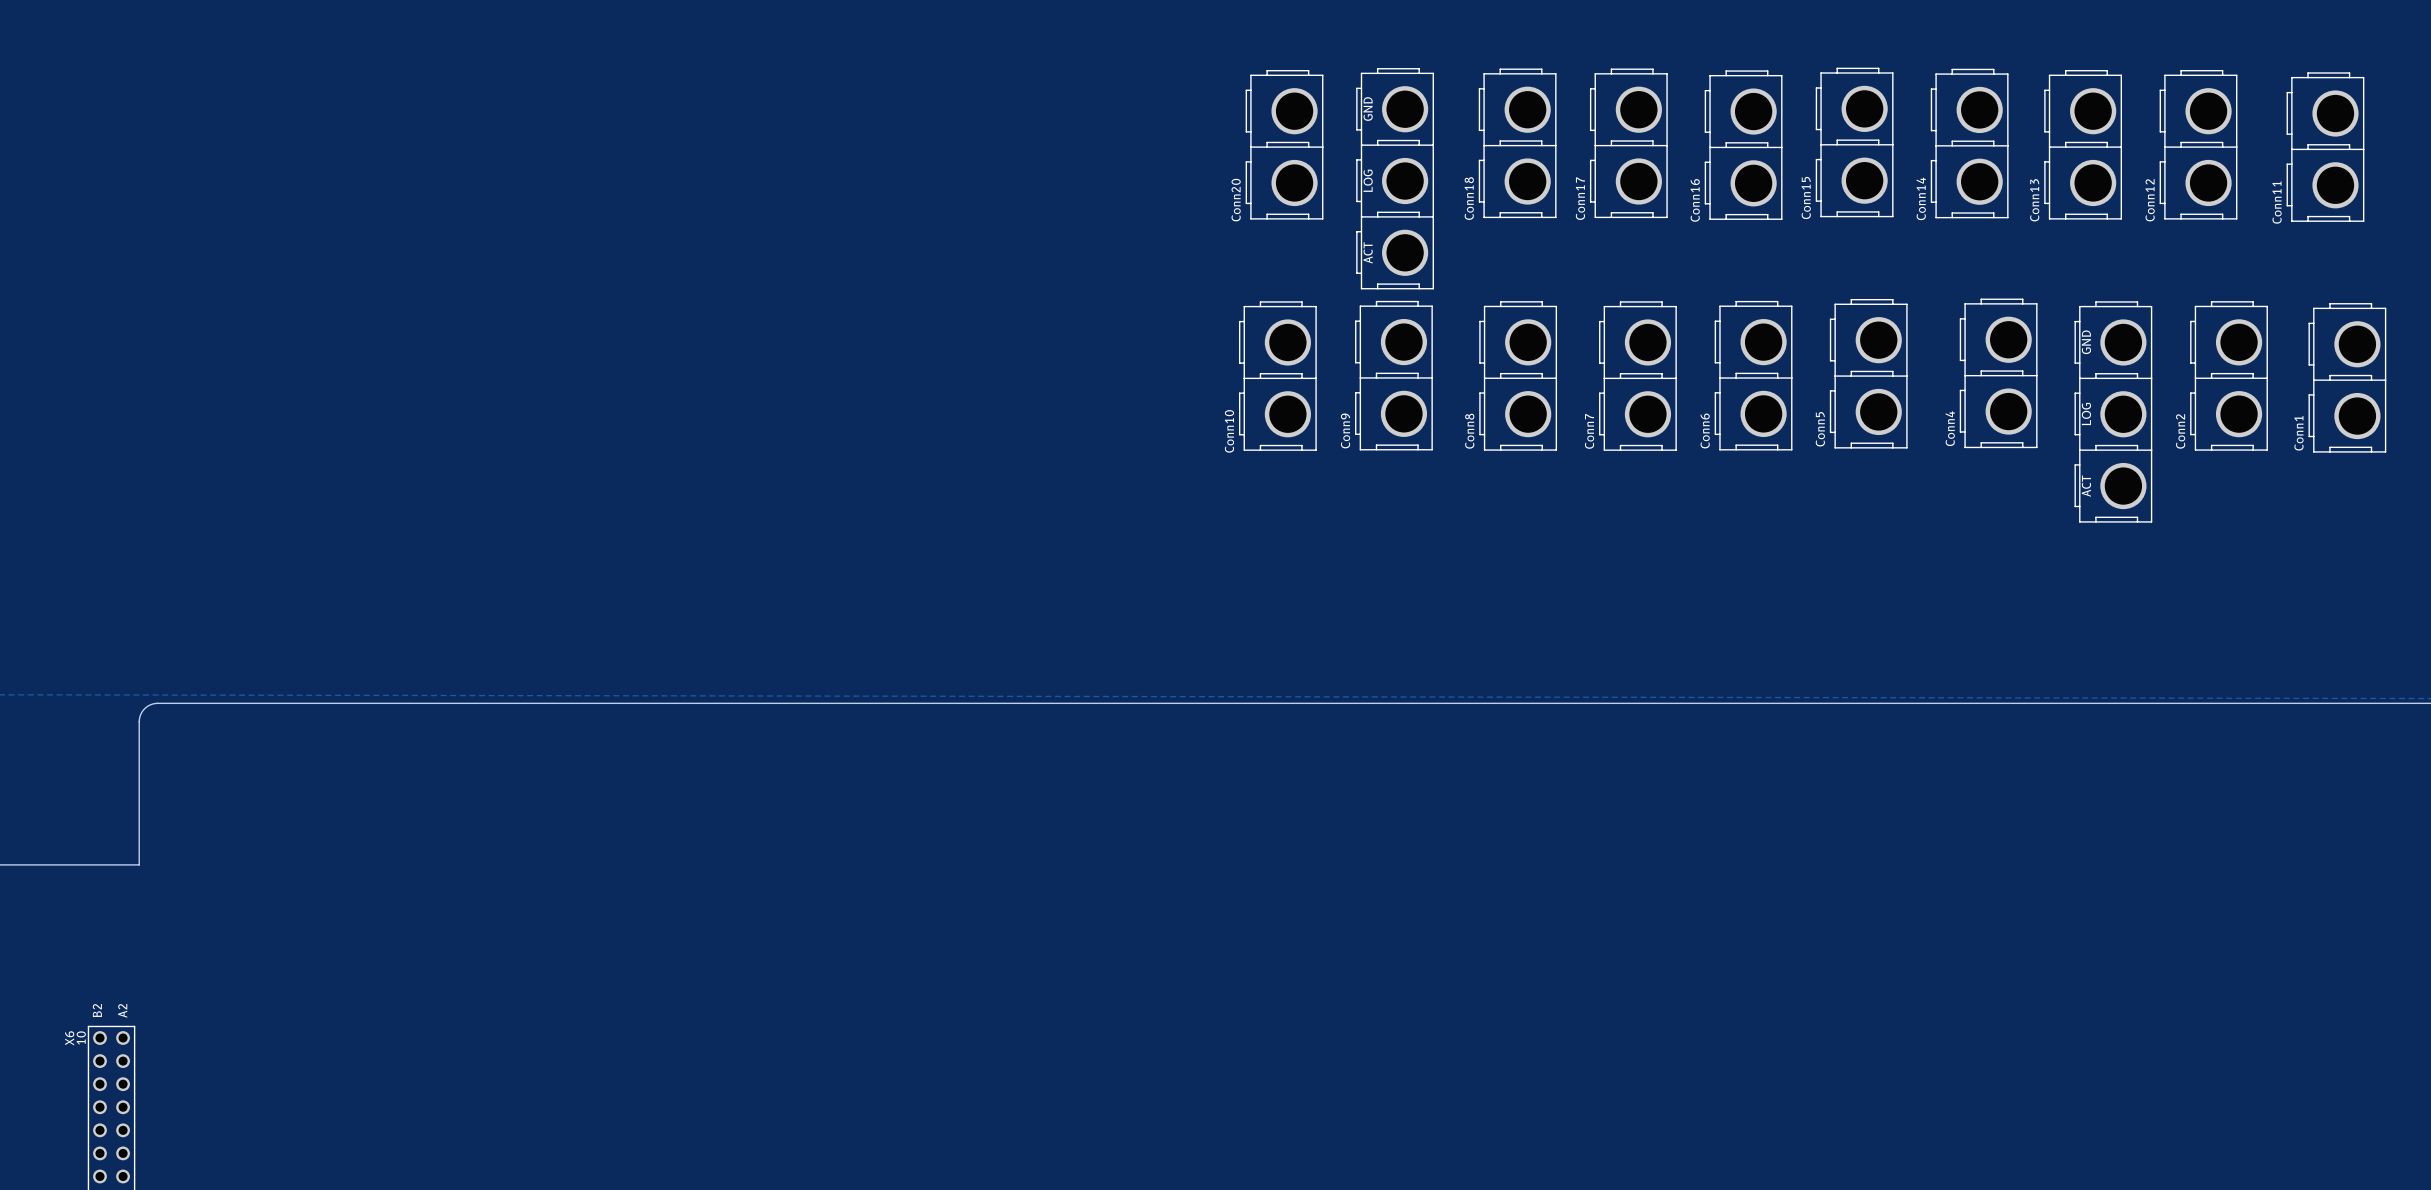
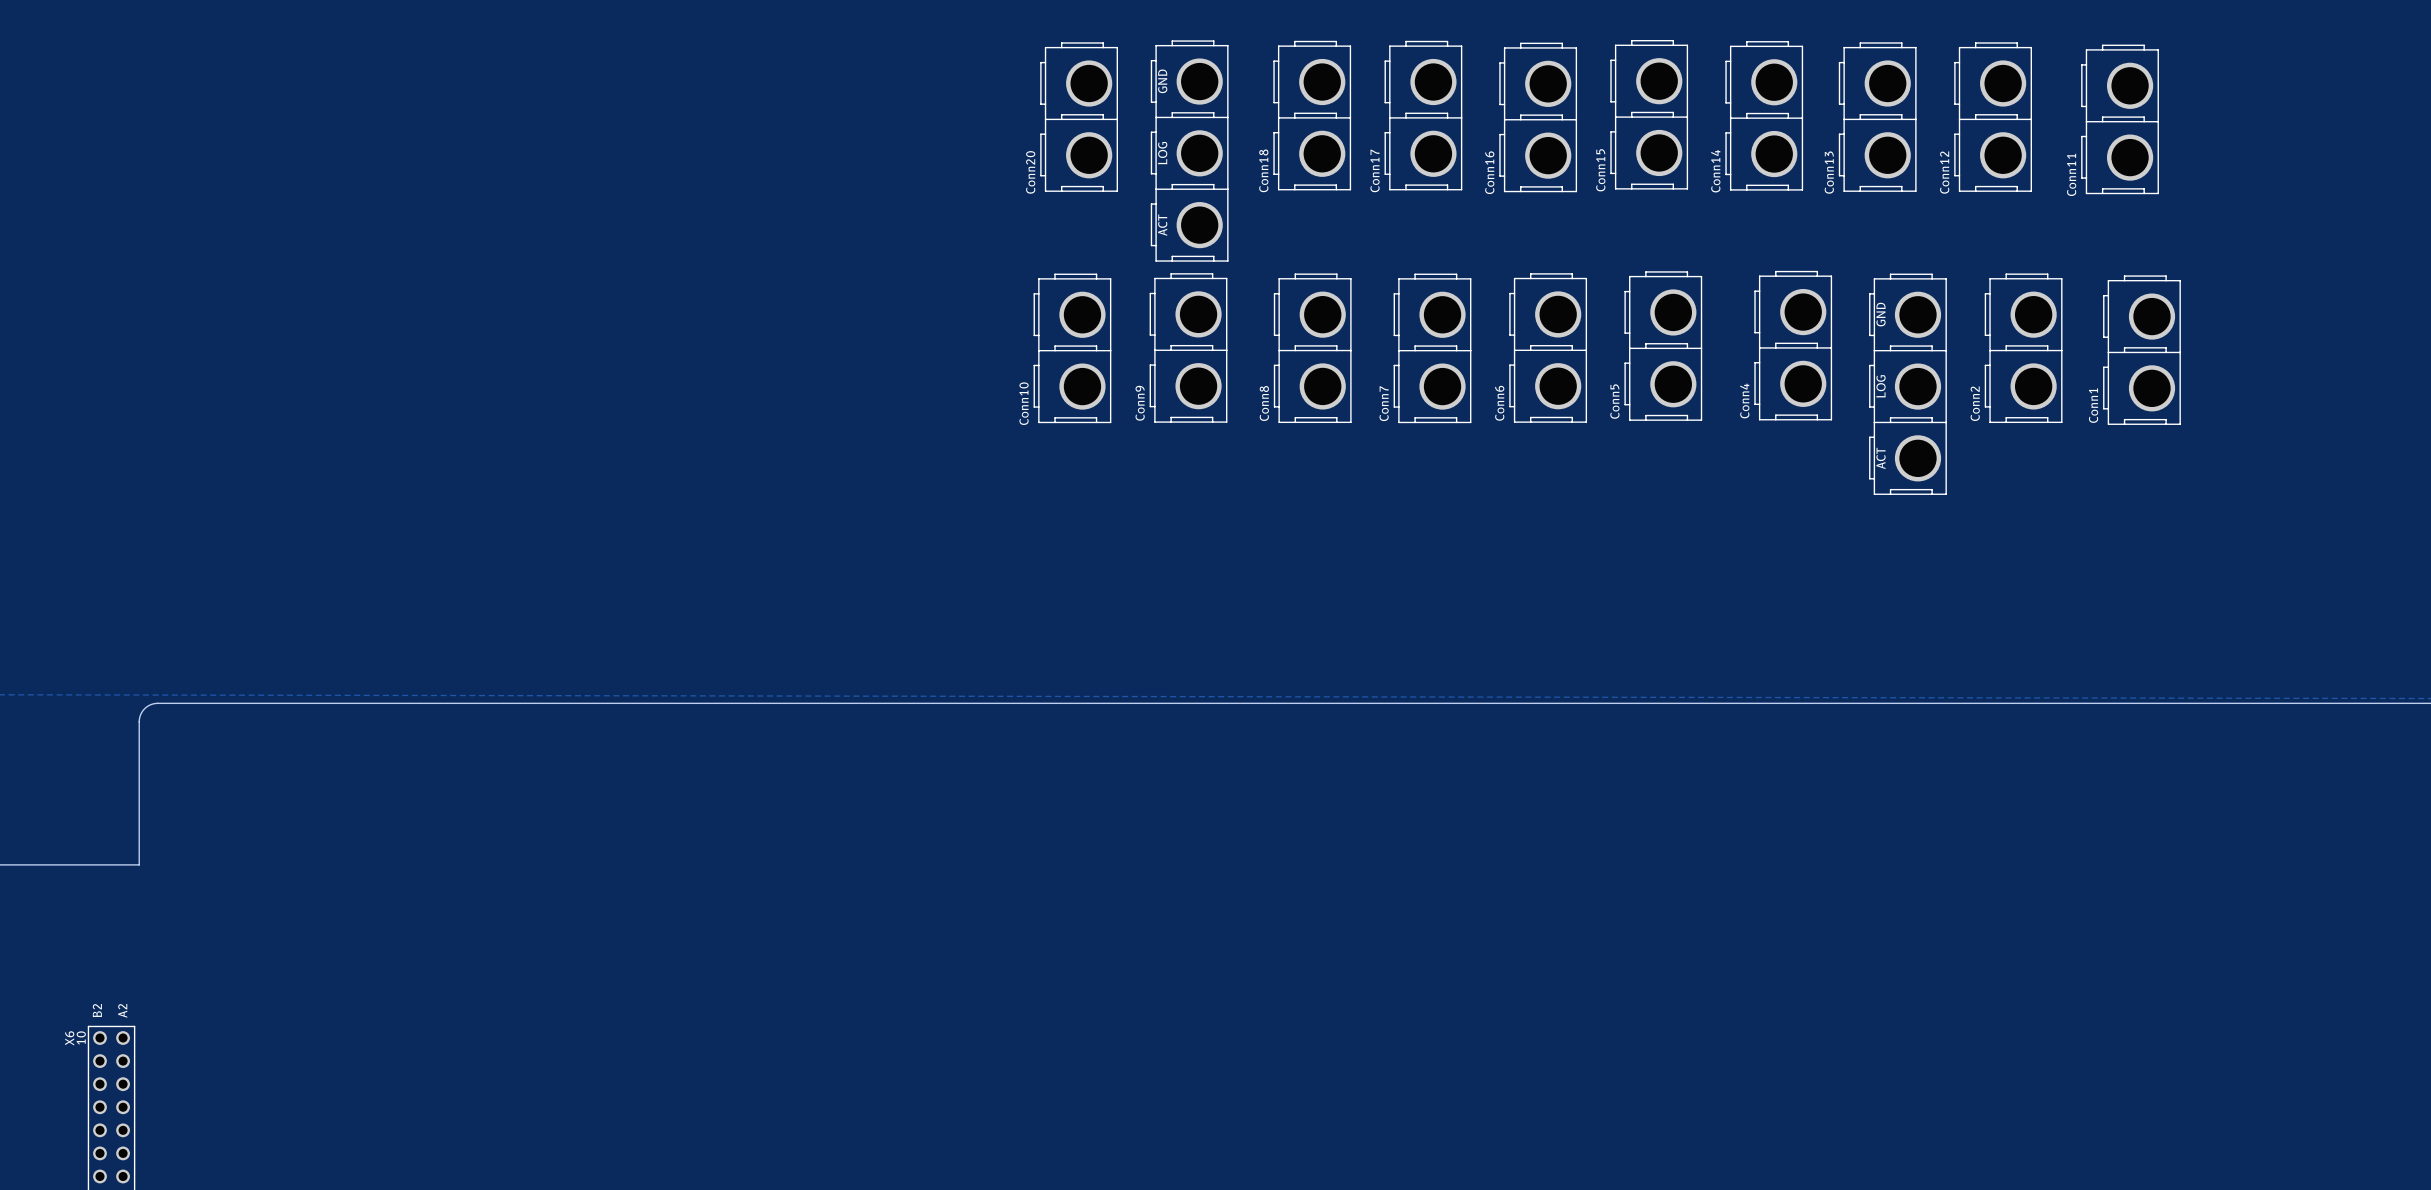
Conn15 position: (1854, 142) -> (1649, 114)
Conn18 position: (1517, 143) -> (1312, 115)
Conn17 position: (1628, 143) -> (1423, 115)
Conn14 position: (1969, 143) -> (1764, 115)
Conn20 position: (1284, 144) -> (1079, 117)
Conn13 position: (2083, 144) -> (1877, 117)
Conn12 position: (2198, 144) -> (1993, 117)
Conn16 position: (1743, 145) -> (1538, 117)
Conn11 position: (2325, 147) -> (2120, 119)
part position: (1395, 178) -> (1189, 151)
Conn5 position: (1868, 373) -> (1663, 346)
Conn4 position: (1998, 373) -> (1793, 345)
Conn9 position: (1393, 375) -> (1188, 347)
Conn8 position: (1518, 375) -> (1312, 348)
Conn6 position: (1753, 375) -> (1548, 348)
Conn2 position: (2229, 375) -> (2023, 348)
Conn10 position: (1277, 376) -> (1072, 348)
Conn7 position: (1637, 376) -> (1432, 348)
Conn1 position: (2347, 377) -> (2141, 350)
part position: (2113, 411) -> (1907, 384)

